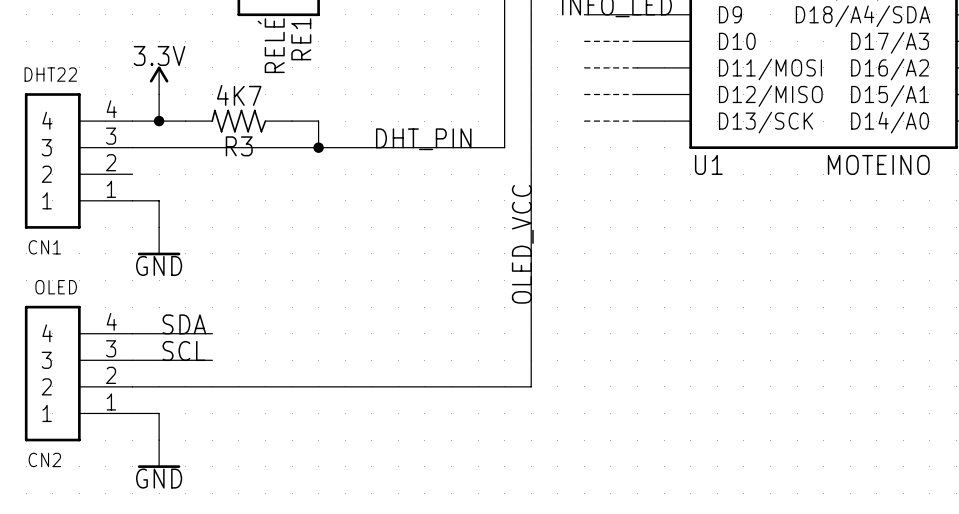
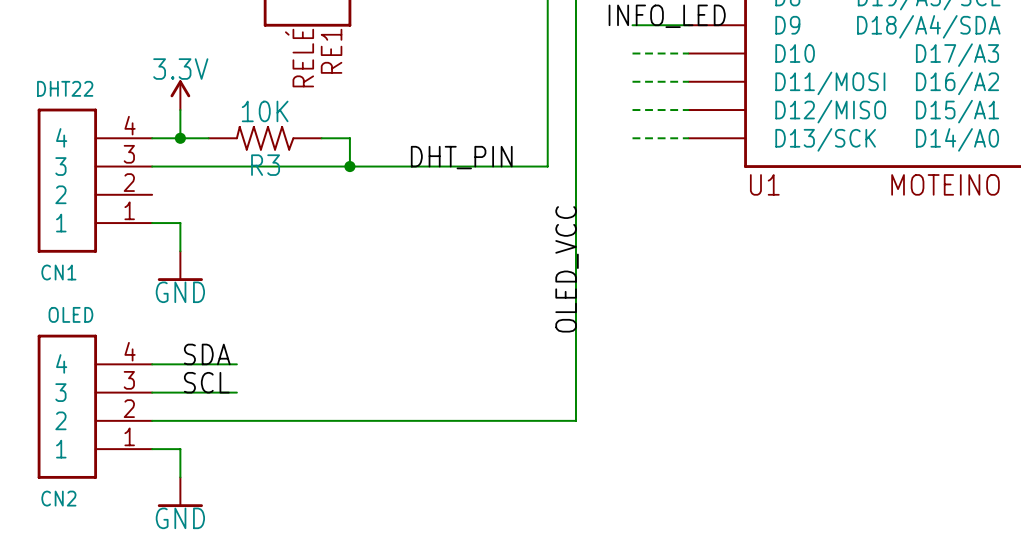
R3 value: 4K7 (239, 95) -> 10K (265, 111)

